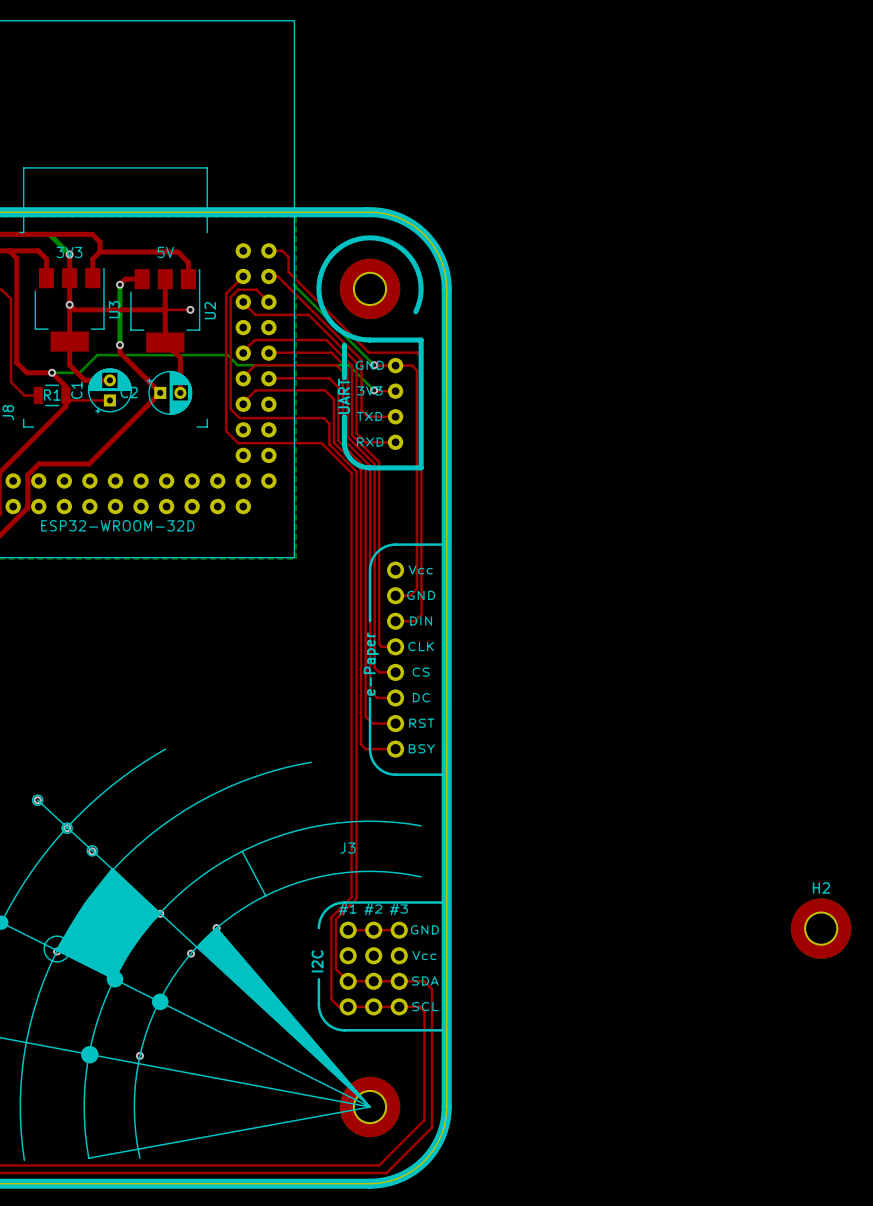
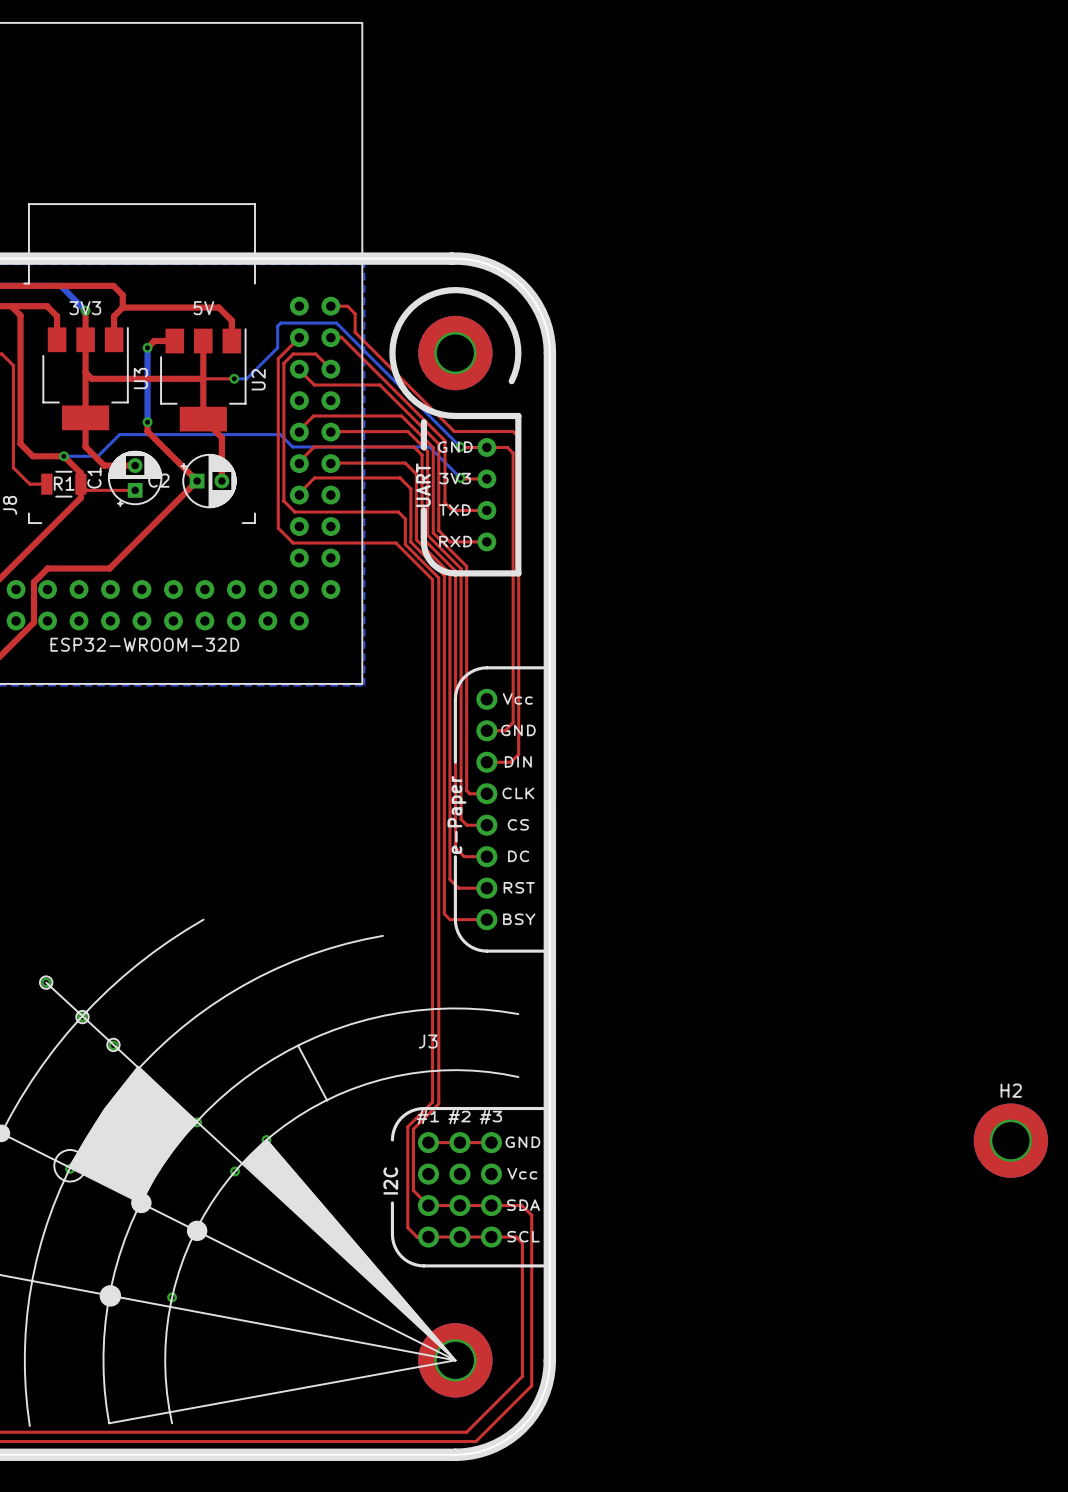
bottom track: none -> (361, 347) (336, 323) (280, 323) (277, 326) (277, 347) (246, 378) (234, 378)
via: (69, 304) -> none
line: (344, 365) (344, 377) -> none

